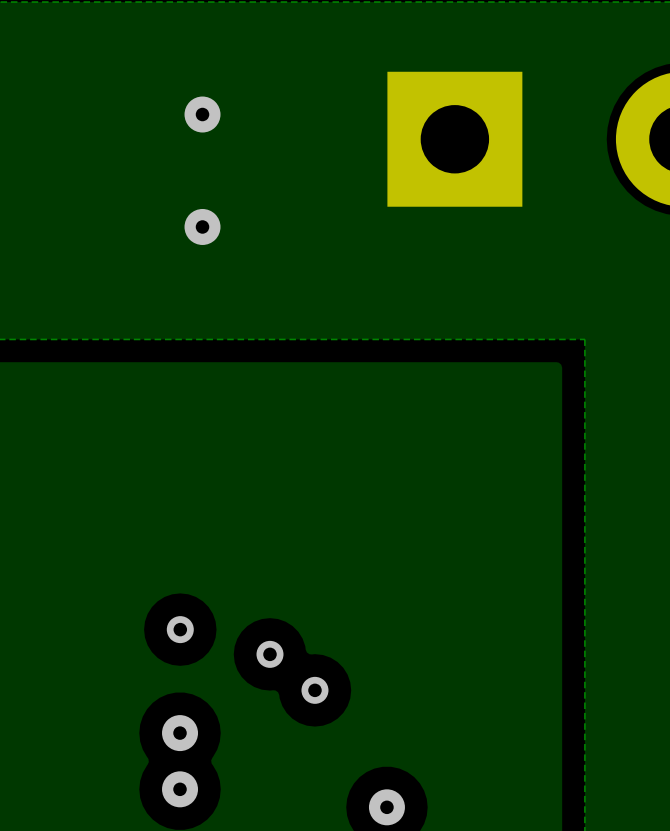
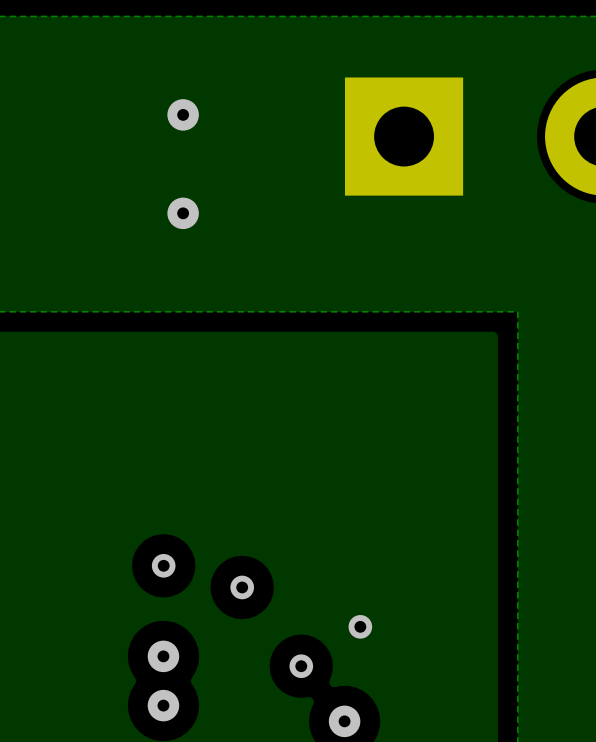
via: (314, 690) -> none
via: none -> (360, 626)
via: none -> (301, 666)

